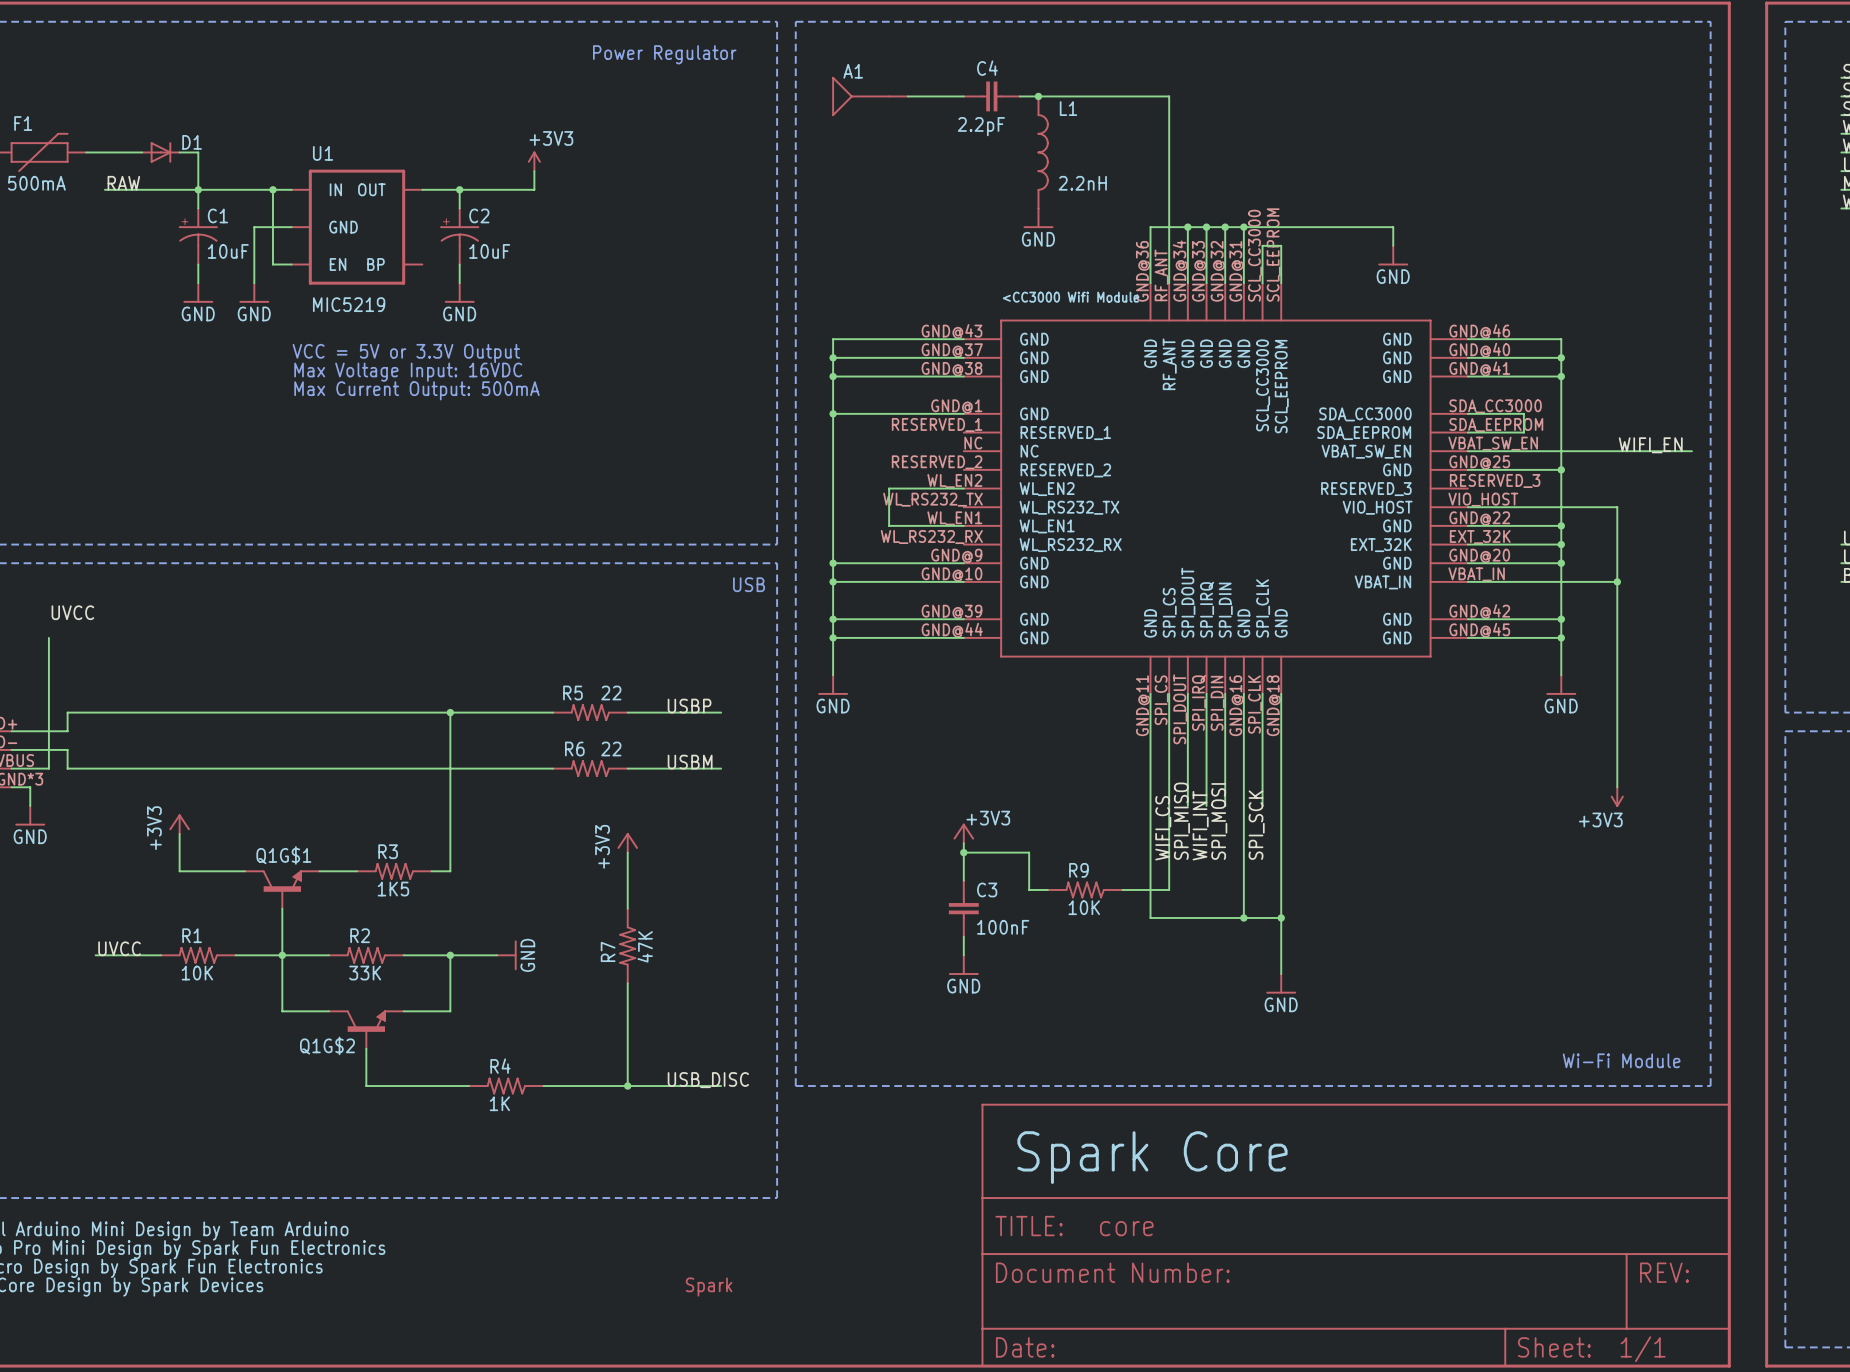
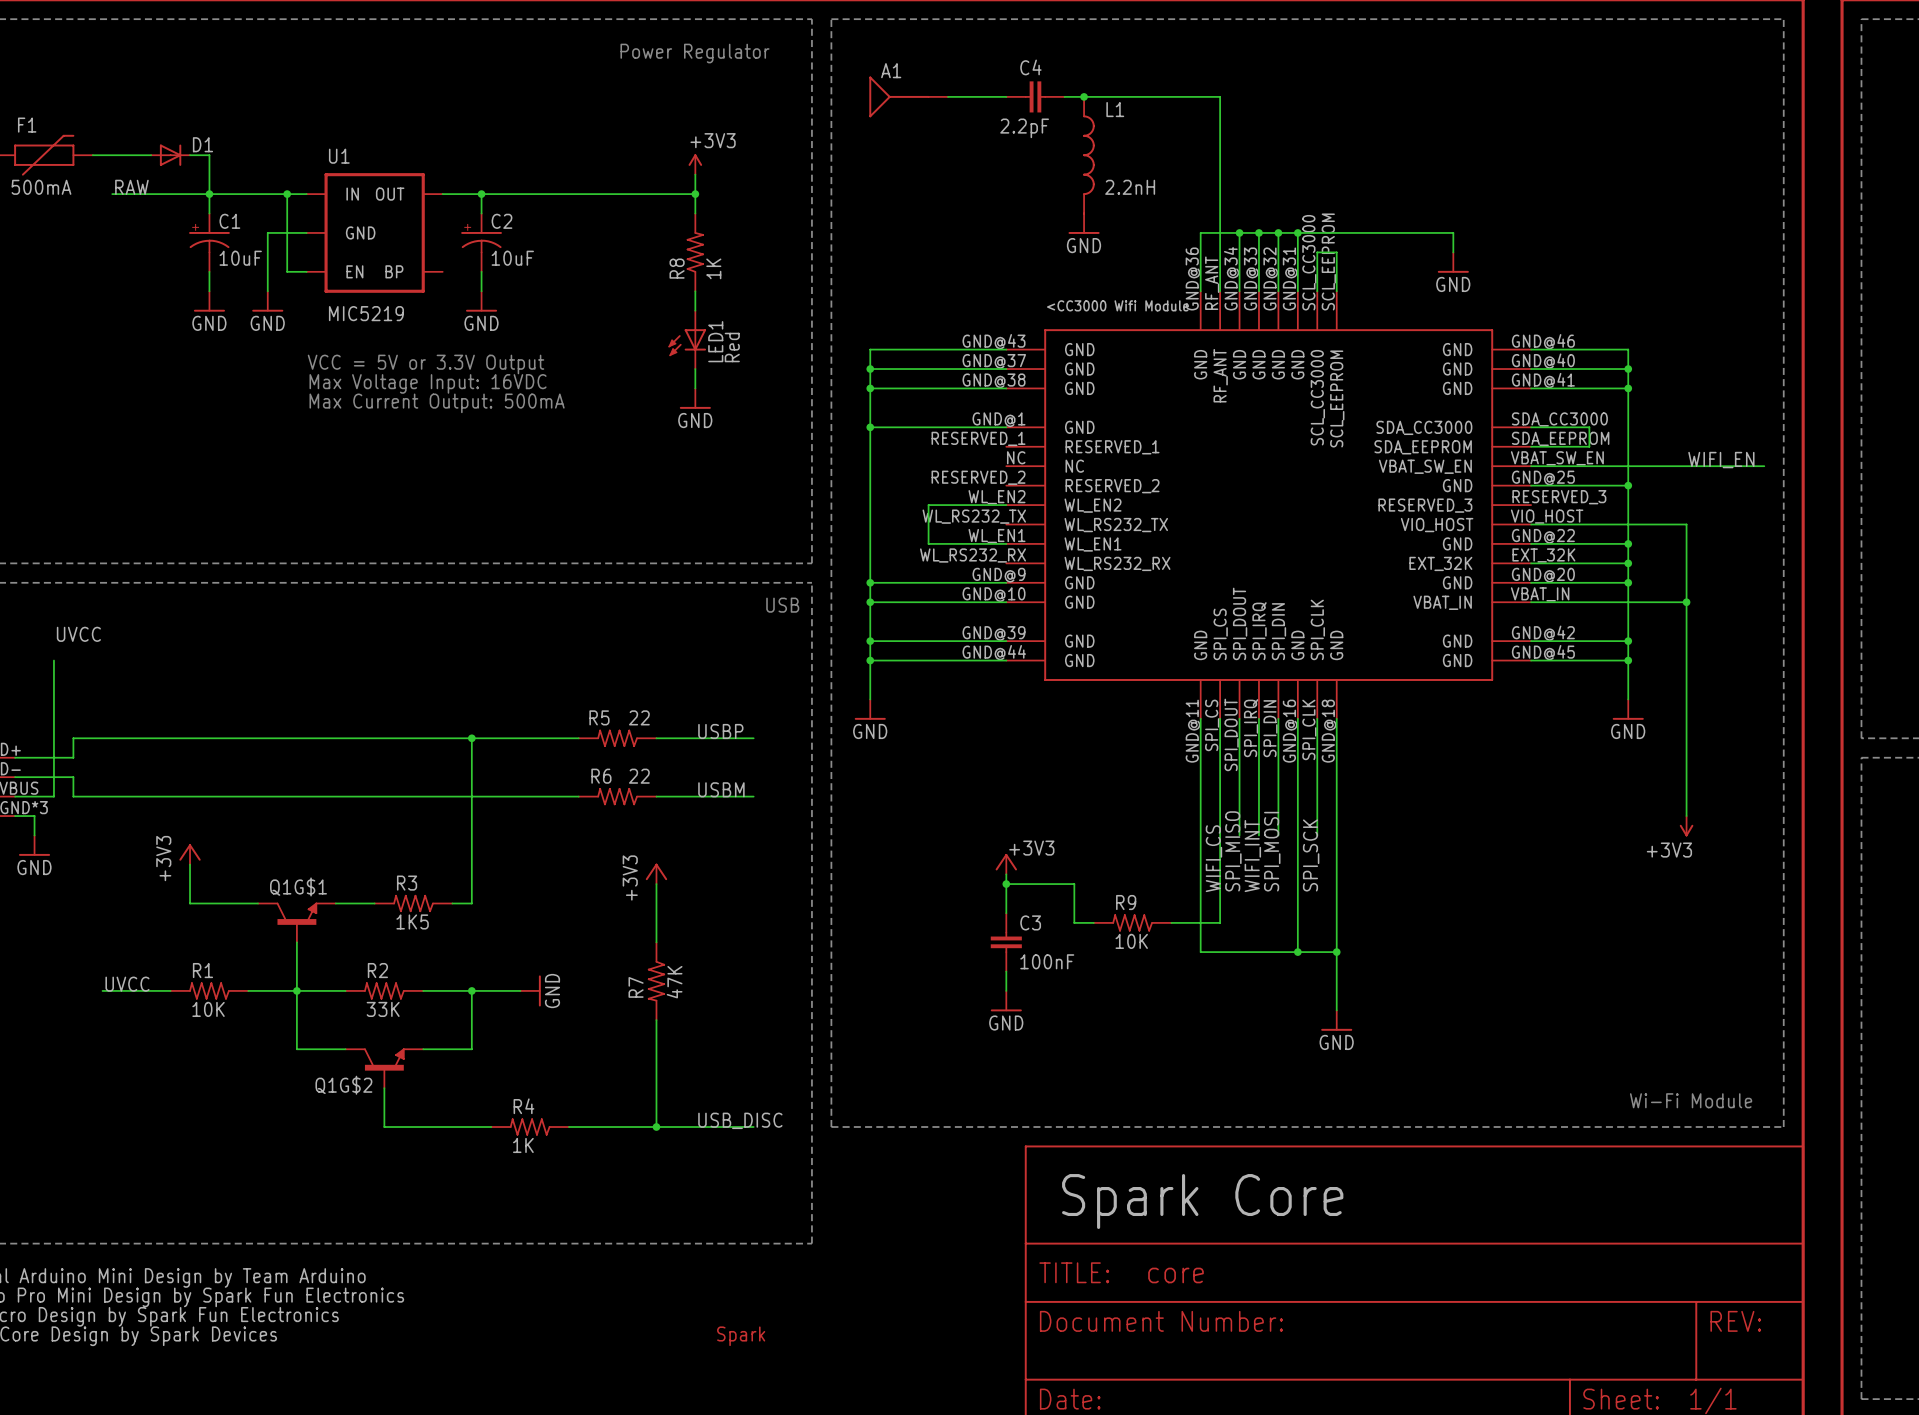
power symbol position: +3V3 (534, 161) -> +3V3 (695, 164)
wire: (534, 171) (534, 189) -> (695, 194) (559, 194)
wire: none -> (695, 174) (695, 213)
junction: none -> (695, 194)
R8: none -> 1K (695, 252)
wire: none -> (695, 291) (695, 310)
LED1: none -> Red (687, 339)
wire: none -> (695, 369) (695, 388)
power symbol: none -> GND (695, 398)

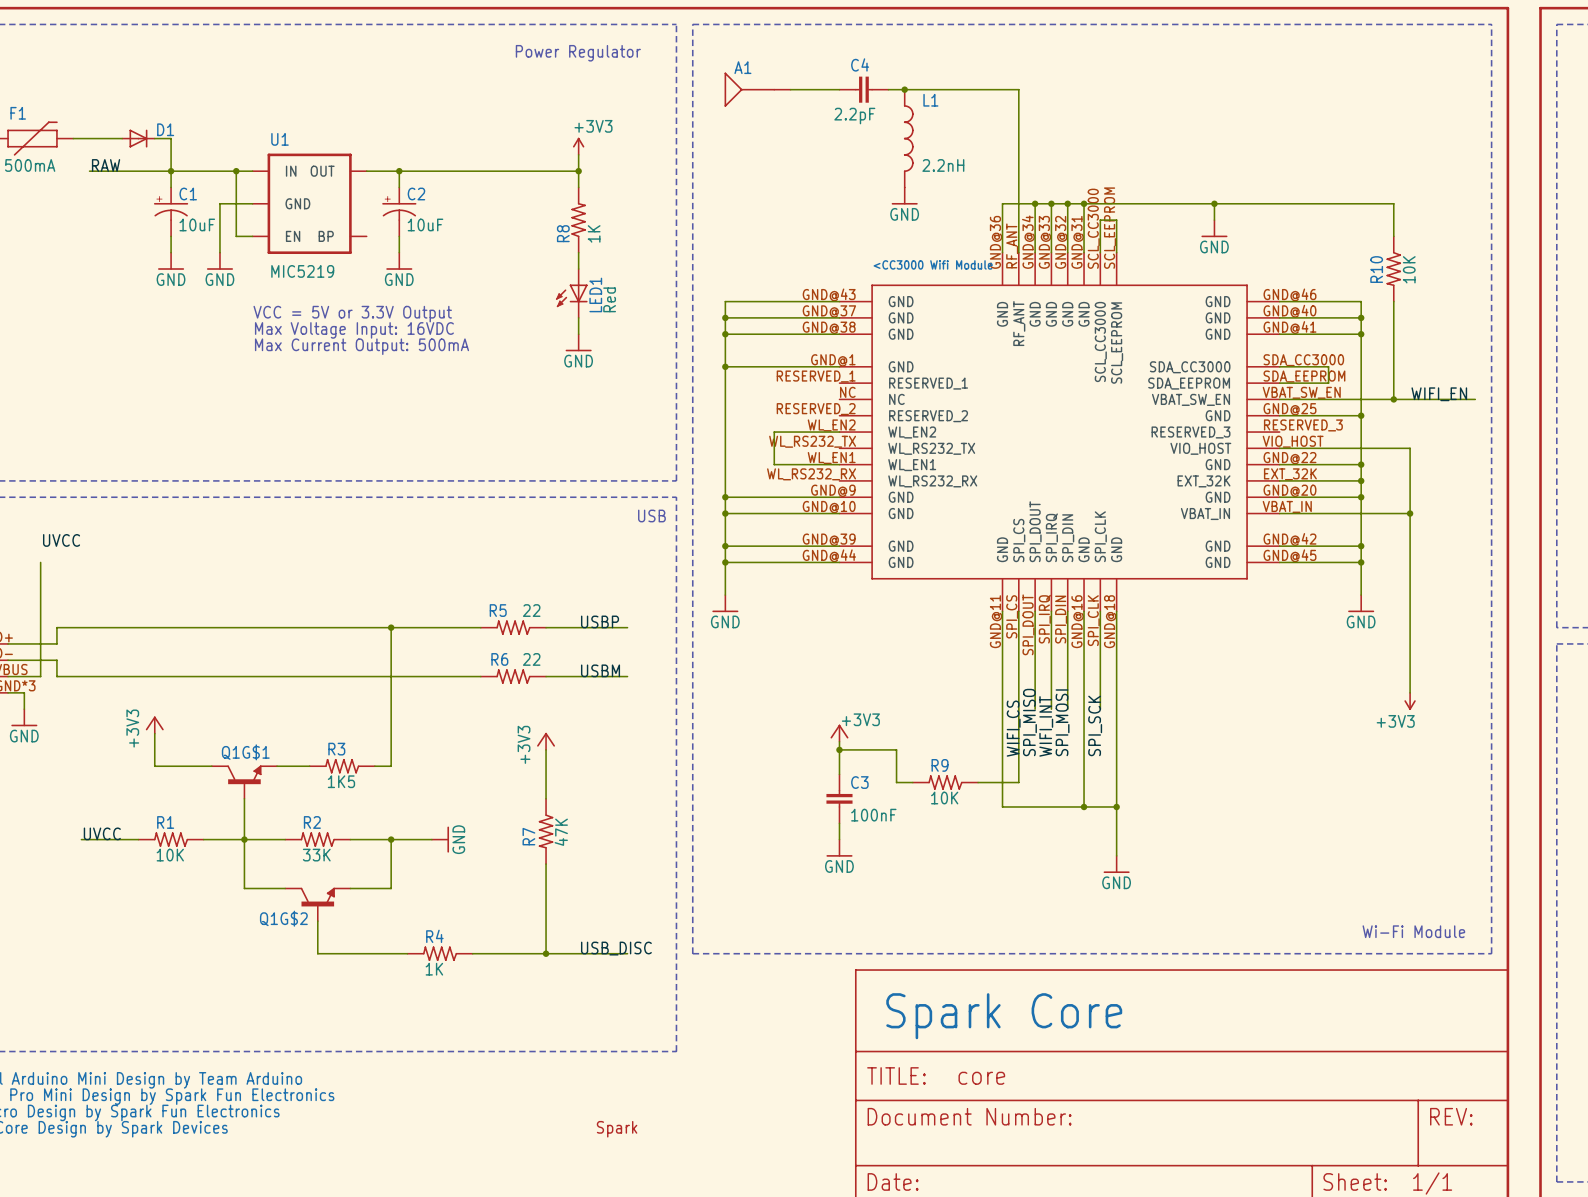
wire: none -> (1214, 203) (1393, 203) (1393, 236)
junction: none -> (1214, 203)
R10: none -> 10K (1393, 269)
wire: none -> (1393, 301) (1393, 399)
junction: none -> (1393, 399)

